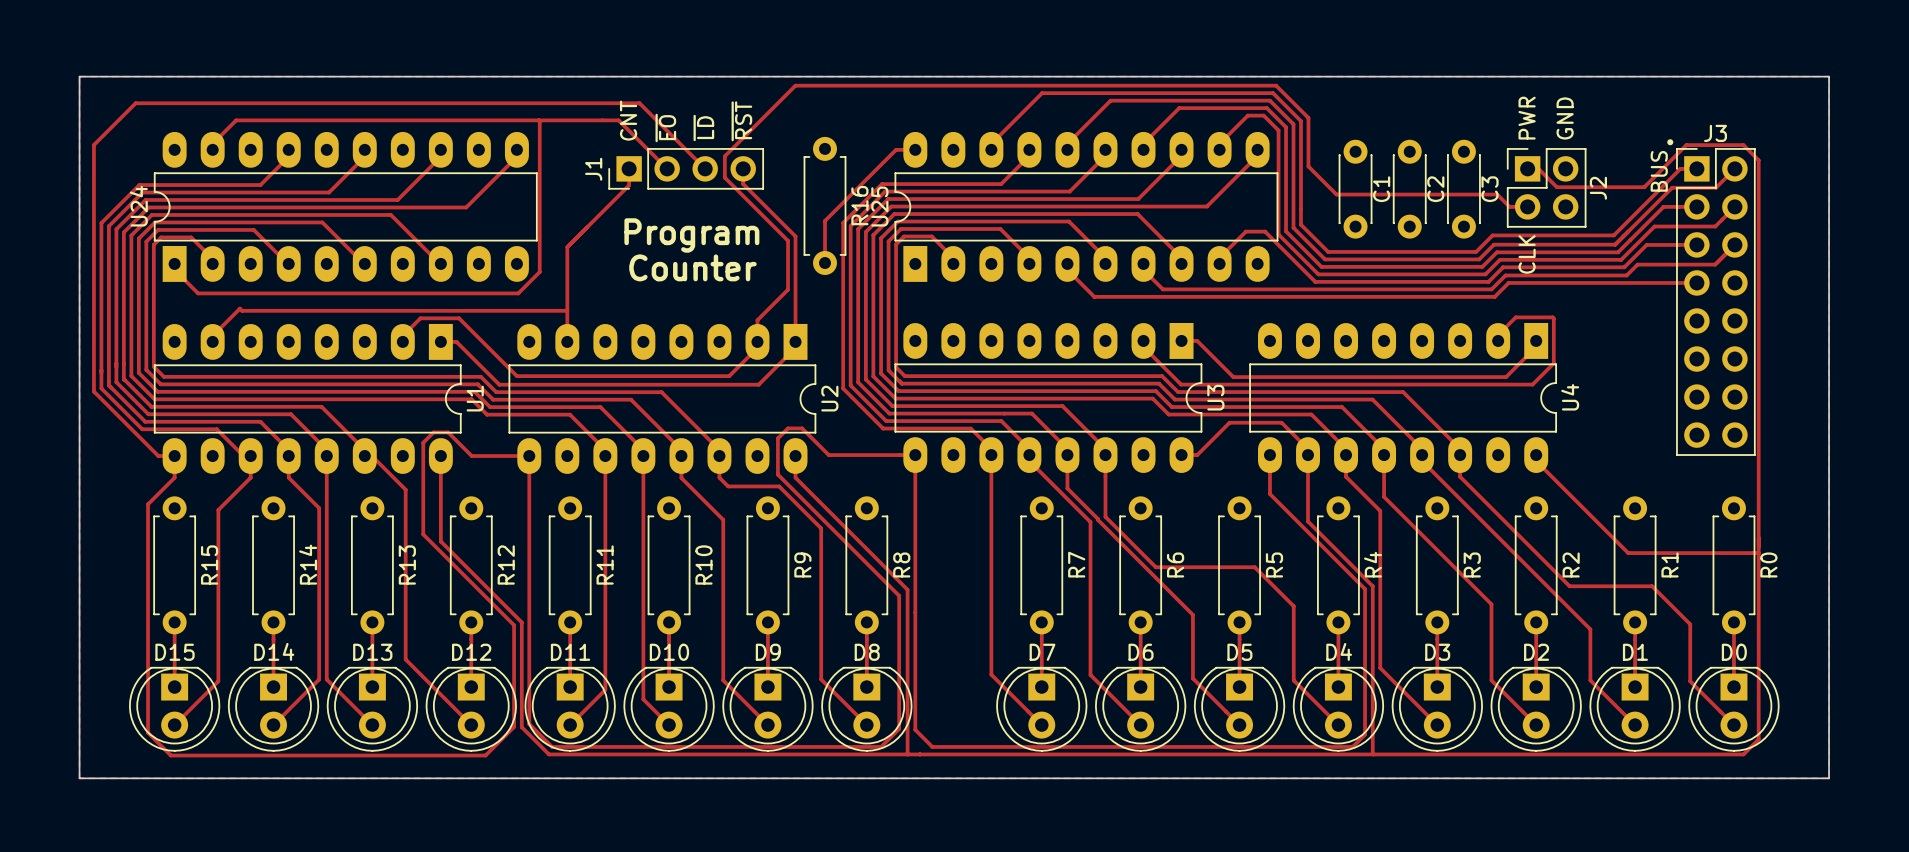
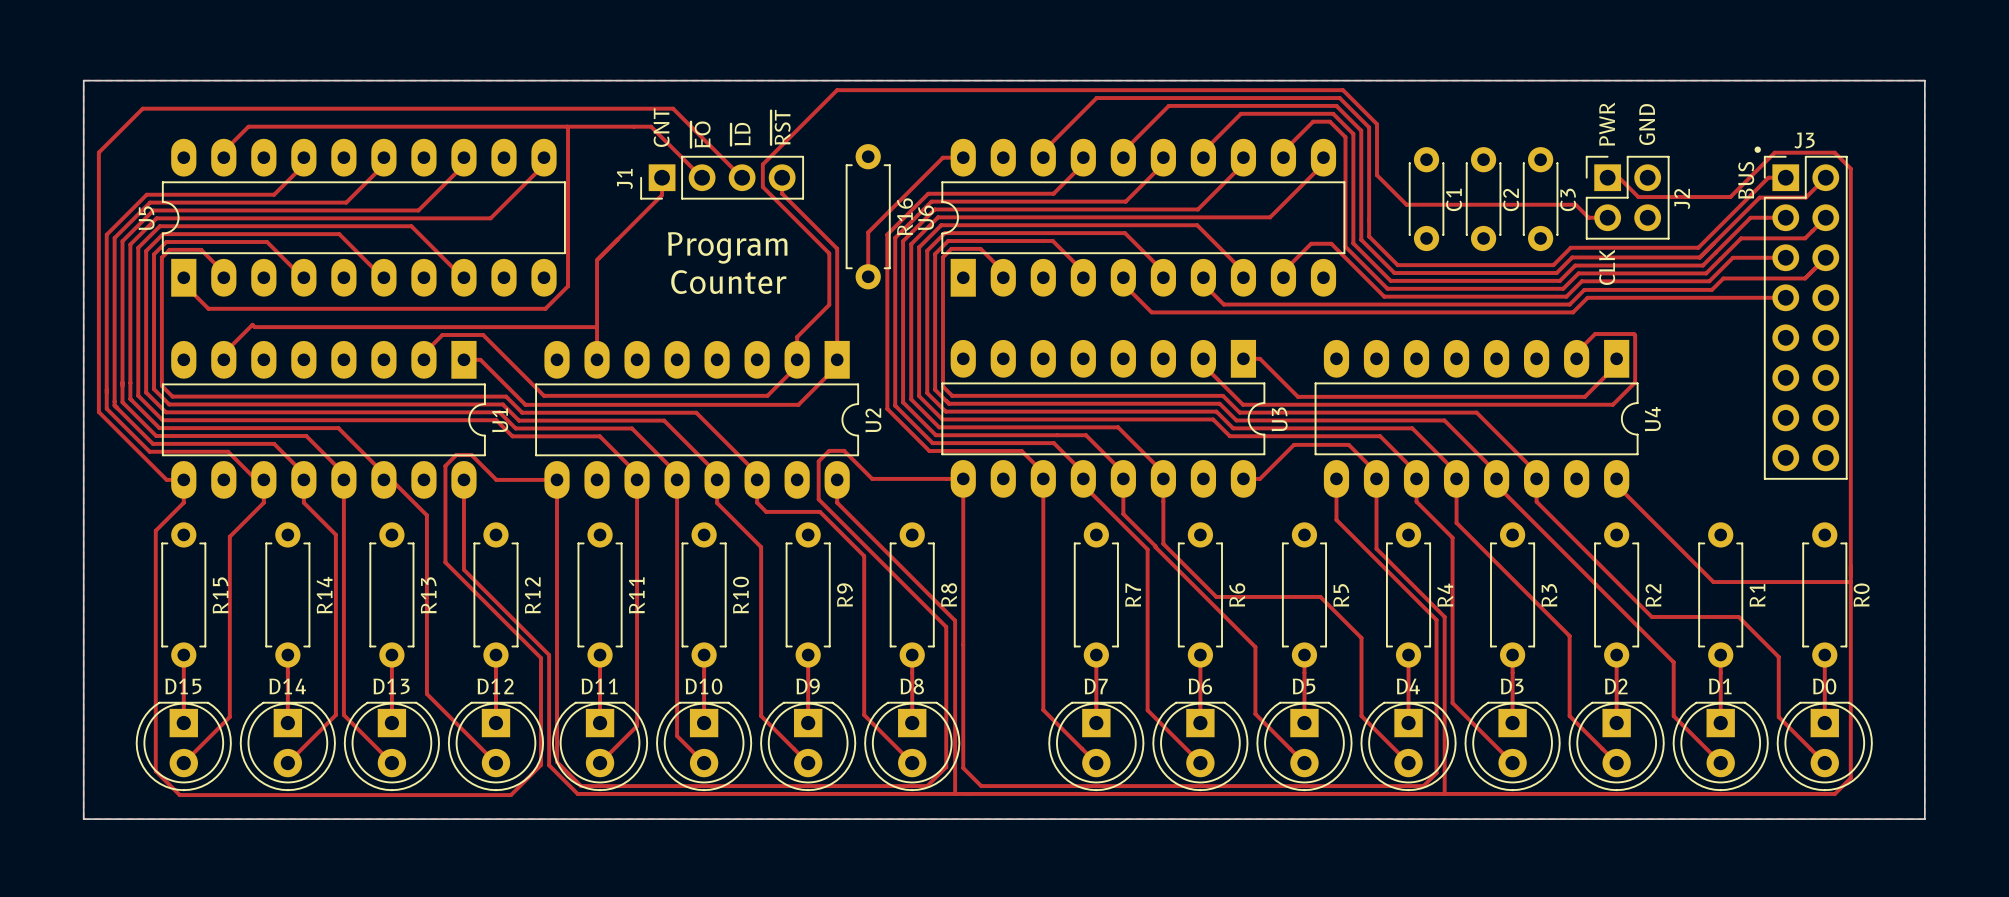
U24 name: U24 (138, 206) -> U5 (146, 218)
U25 name: U25 (879, 206) -> U6 (926, 217)

